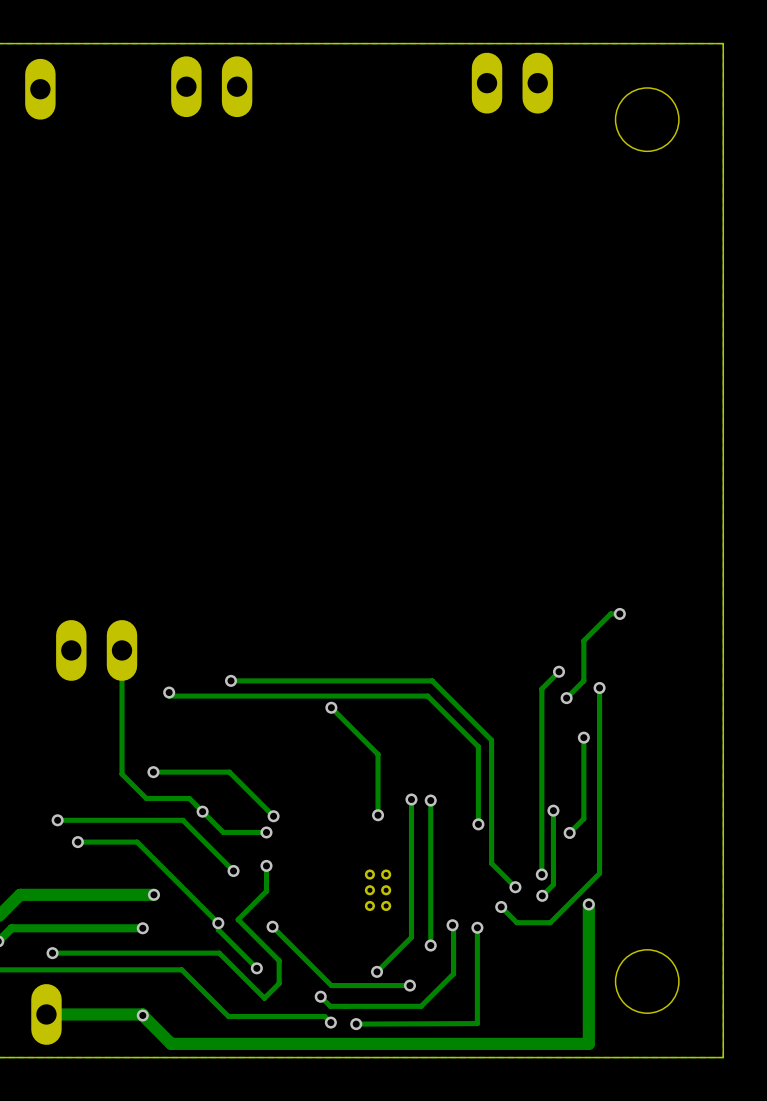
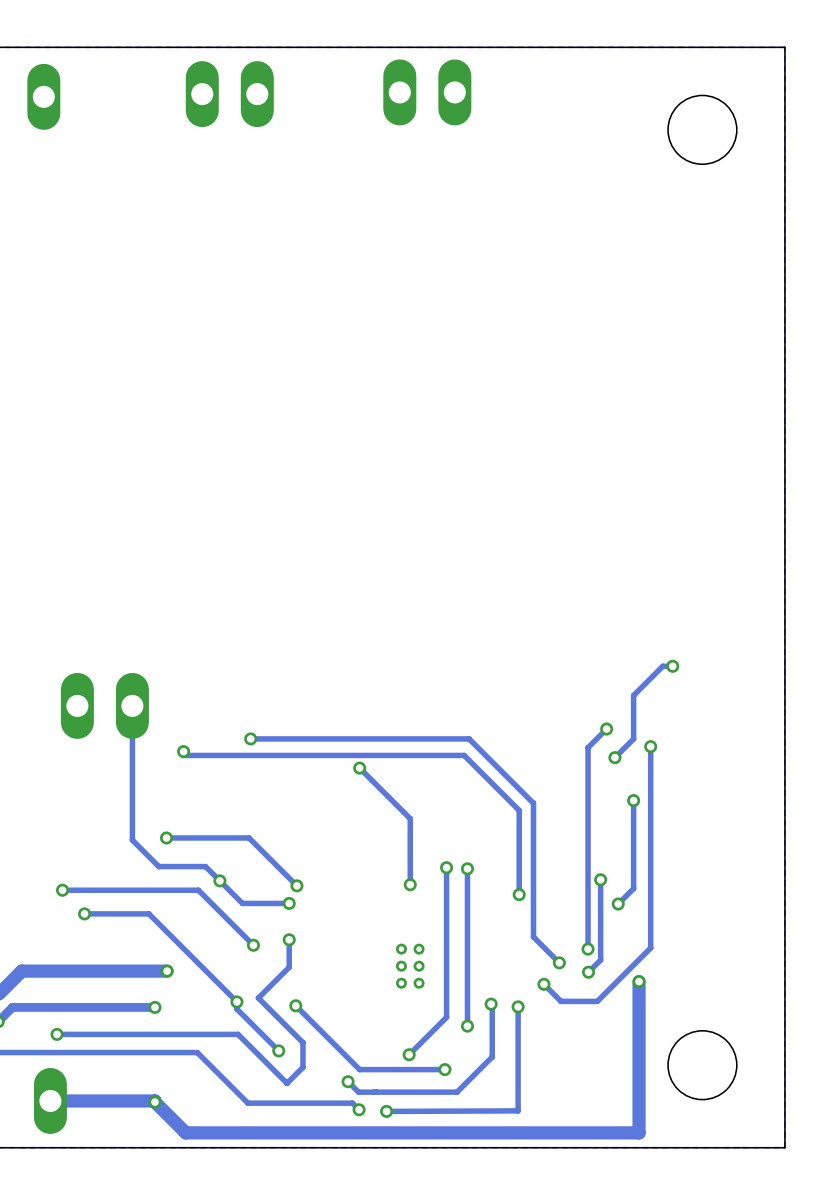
part position: (512, 83) -> (427, 92)

